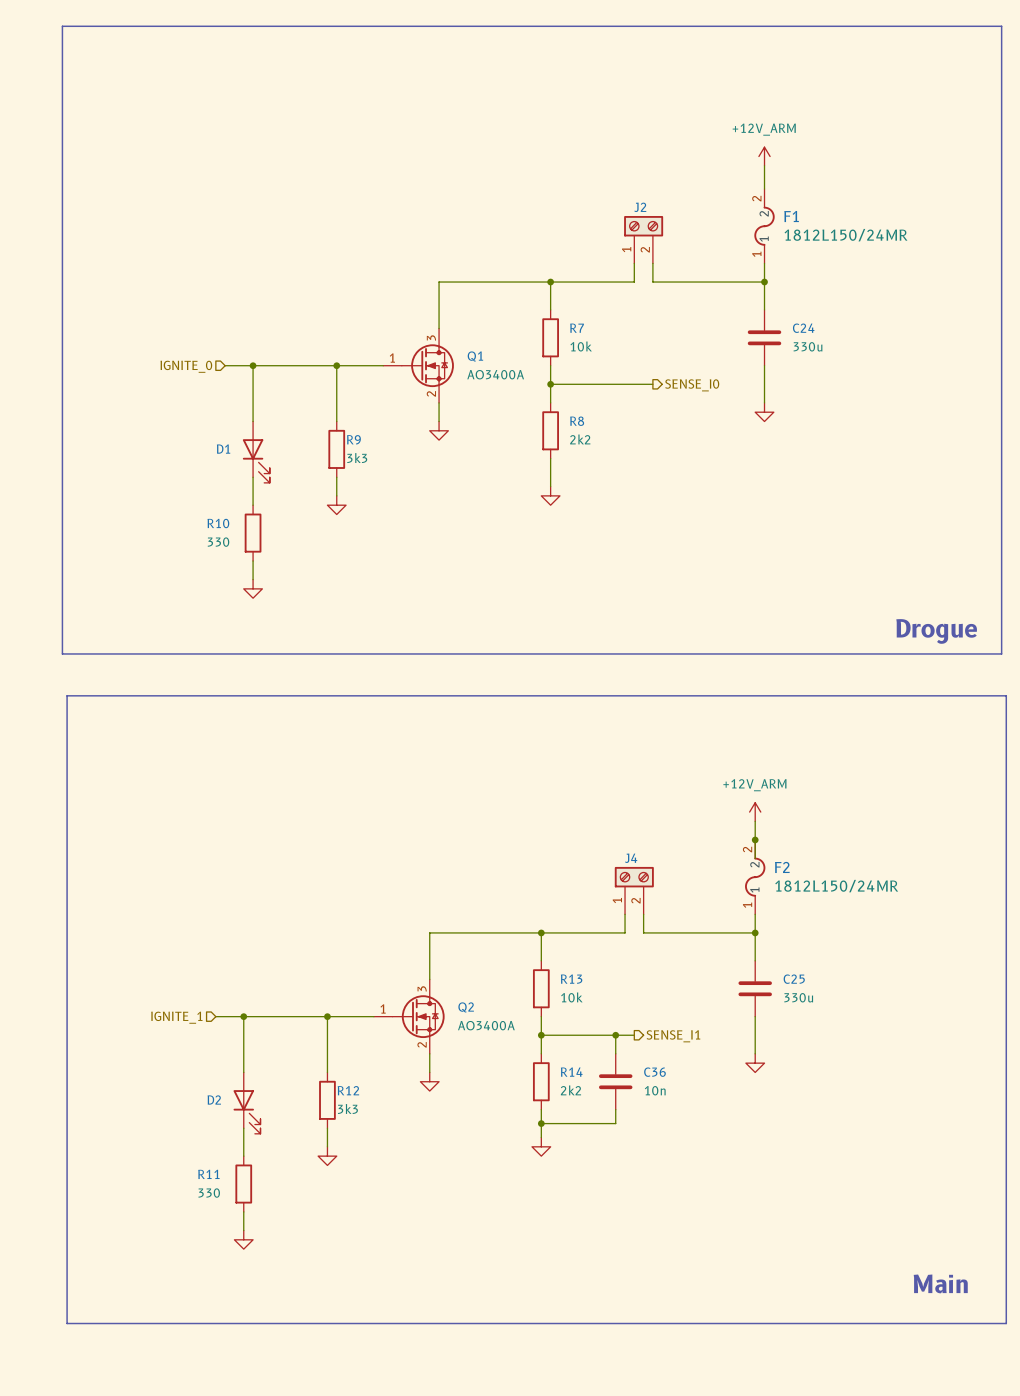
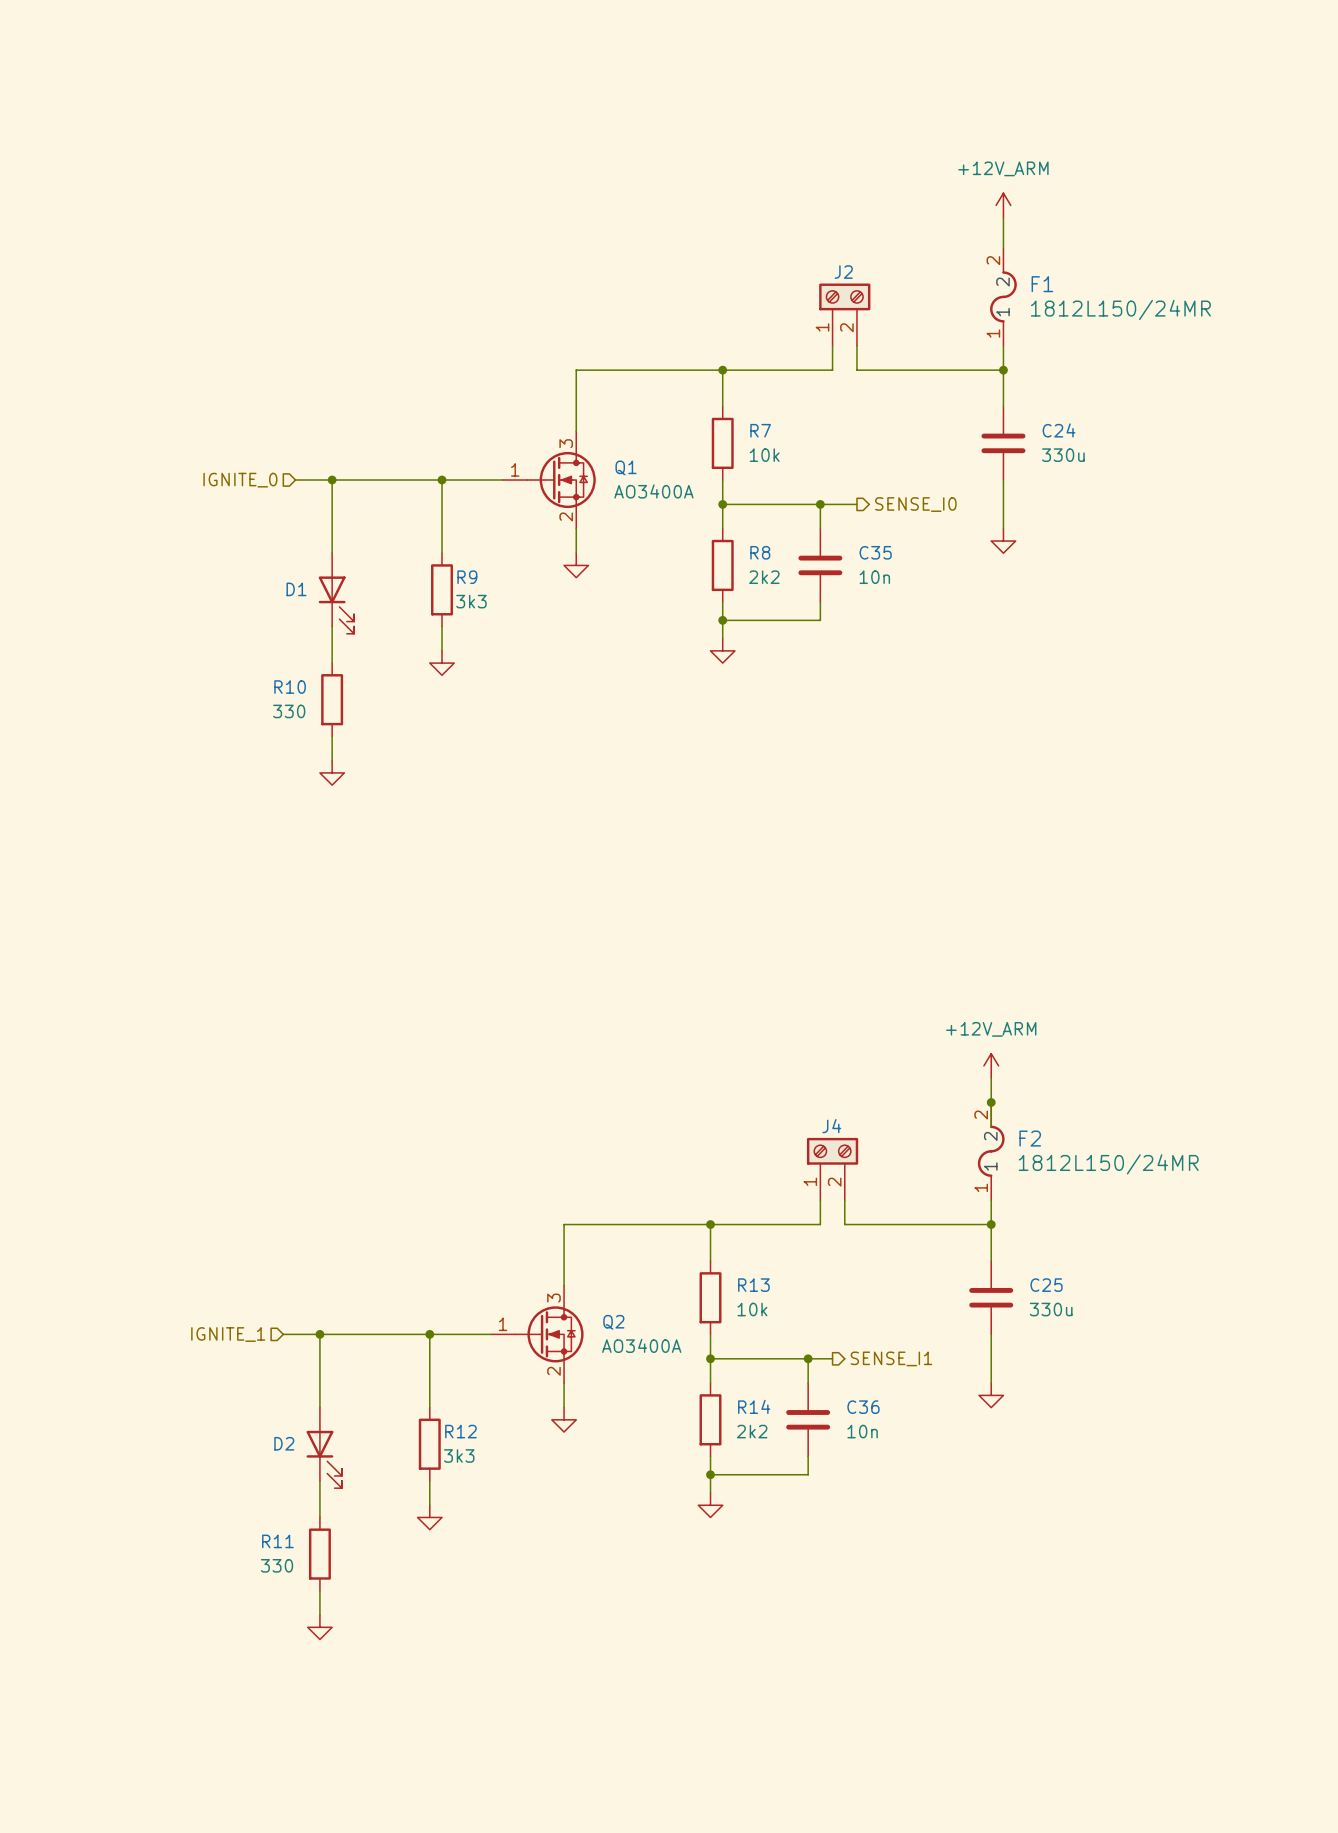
line: (62, 26) (1001, 26) (1001, 653) (62, 653) (62, 26) -> none
wire: none -> (820, 504) (820, 528)
junction: none -> (820, 504)
C35: none -> 10n (820, 565)
wire: none -> (820, 602) (820, 620) (722, 620)
junction: none -> (722, 620)
text: Drogue (936, 631) -> none
line: (67, 695) (1006, 695) (1006, 1323) (67, 1323) (67, 695) -> none
text: Main (940, 1283) -> none

